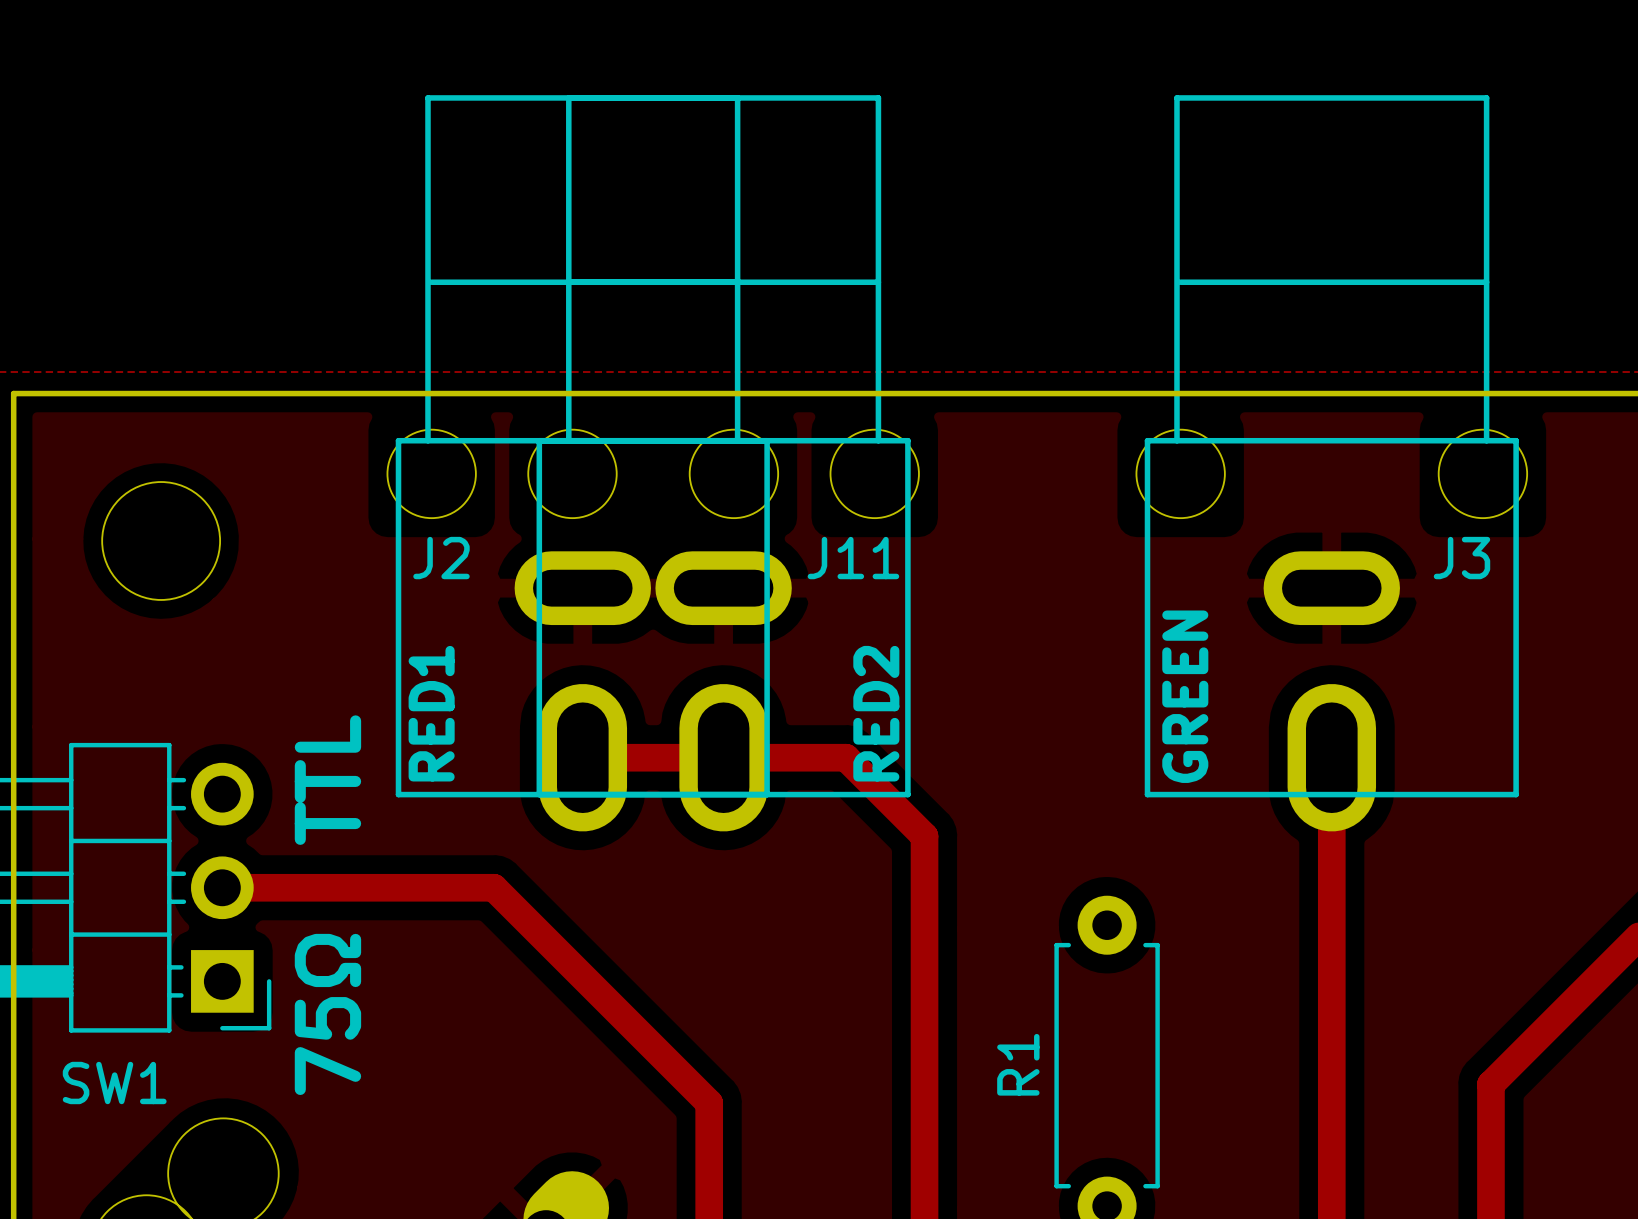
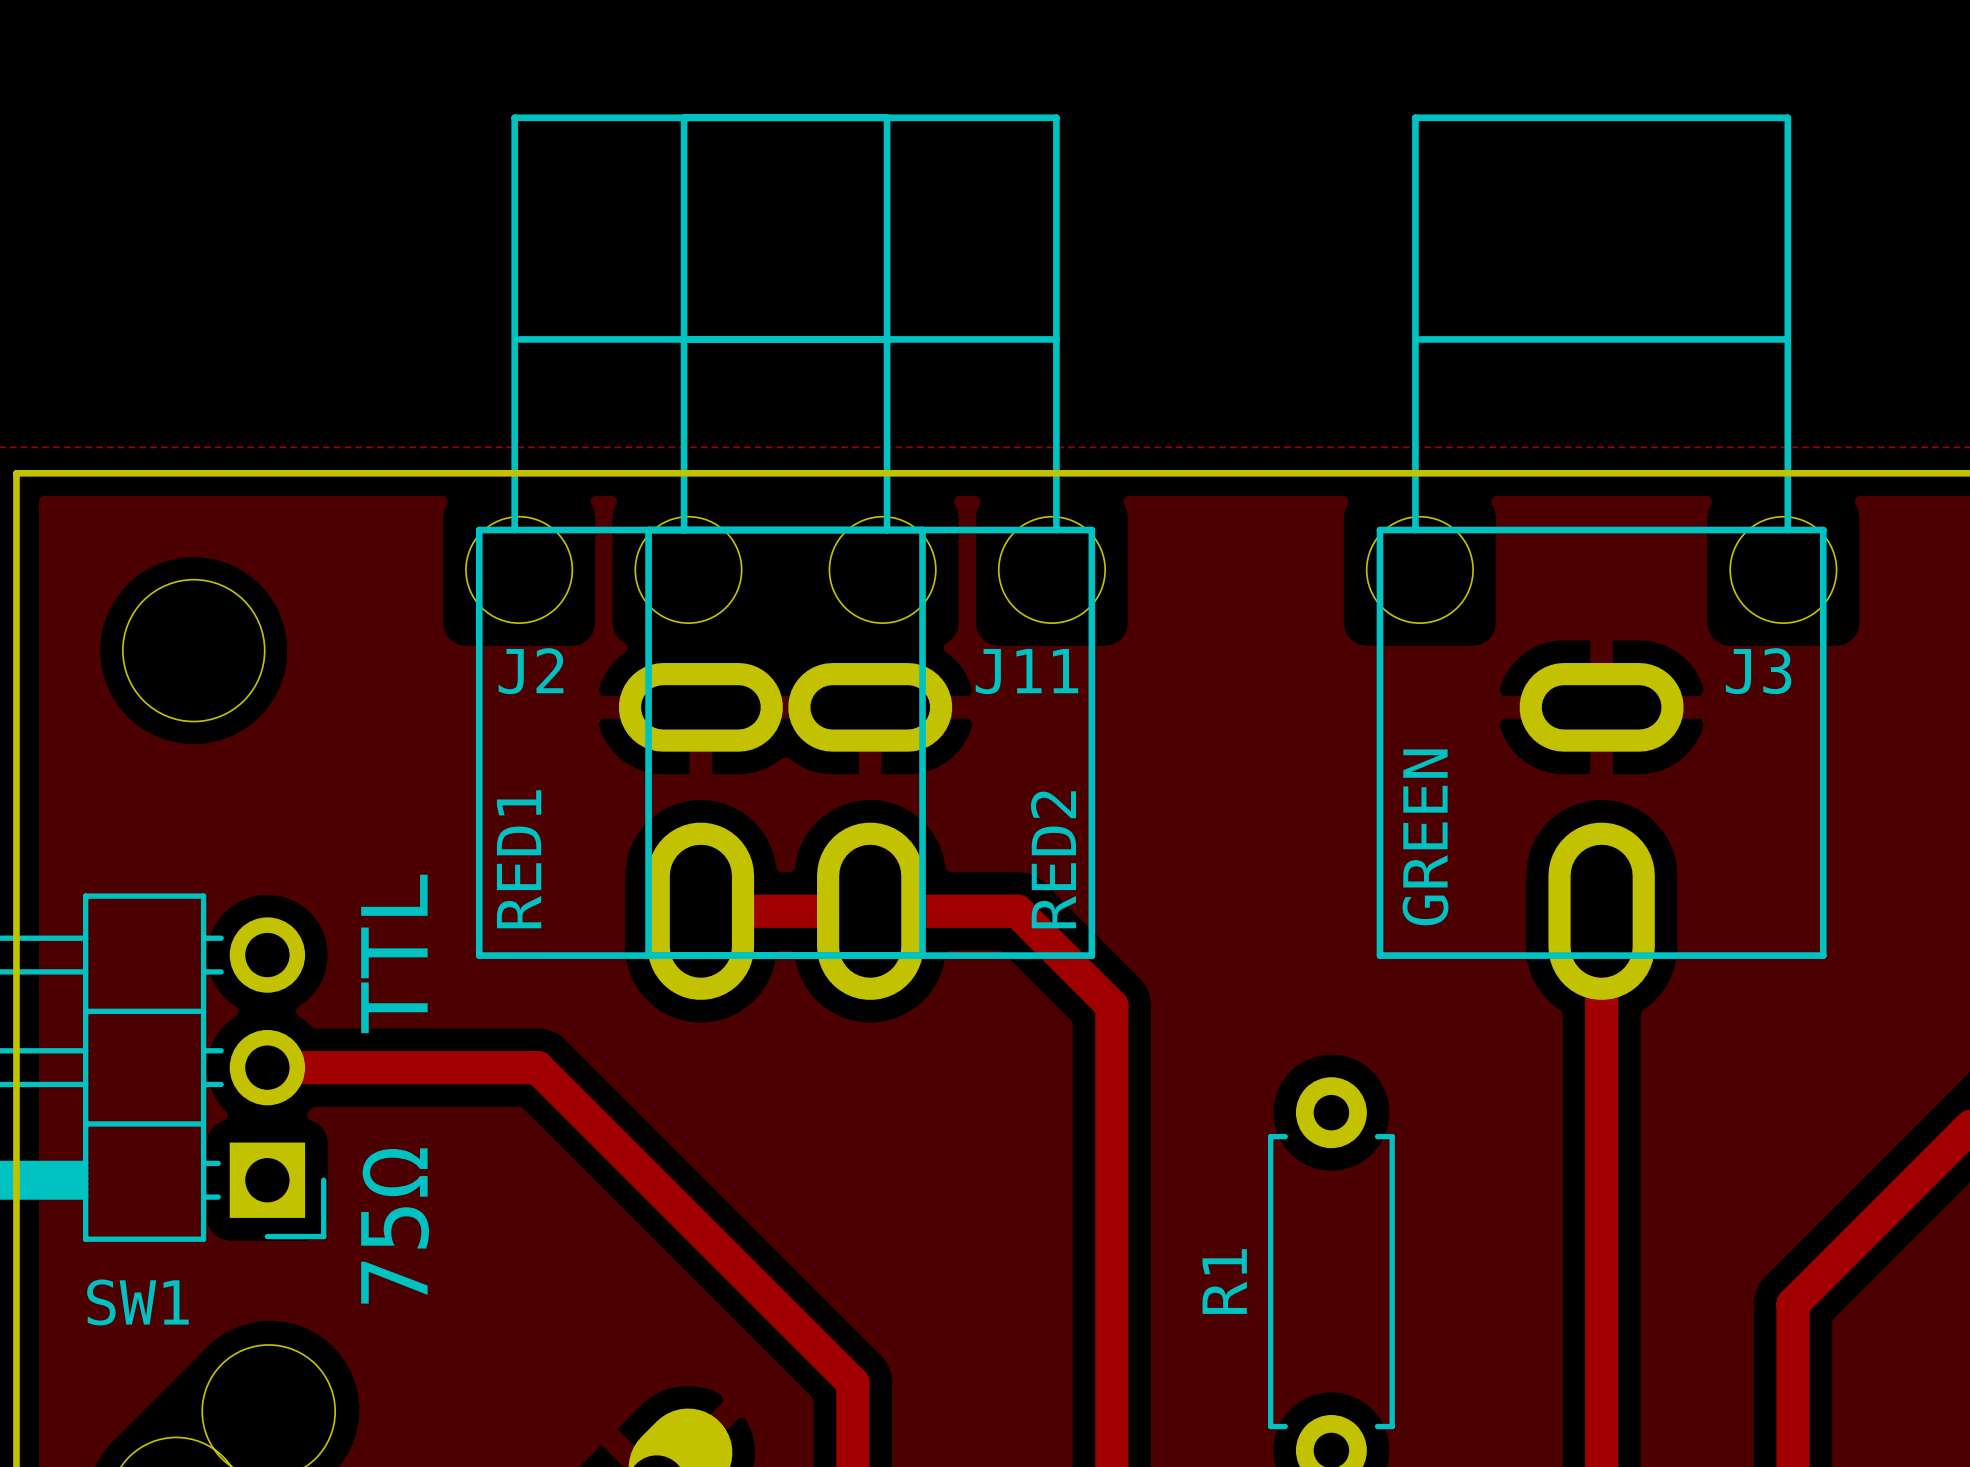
track: (447, 887) (493, 887) (709, 1103) (709, 1149) -> (537, 1067) (852, 1382)

